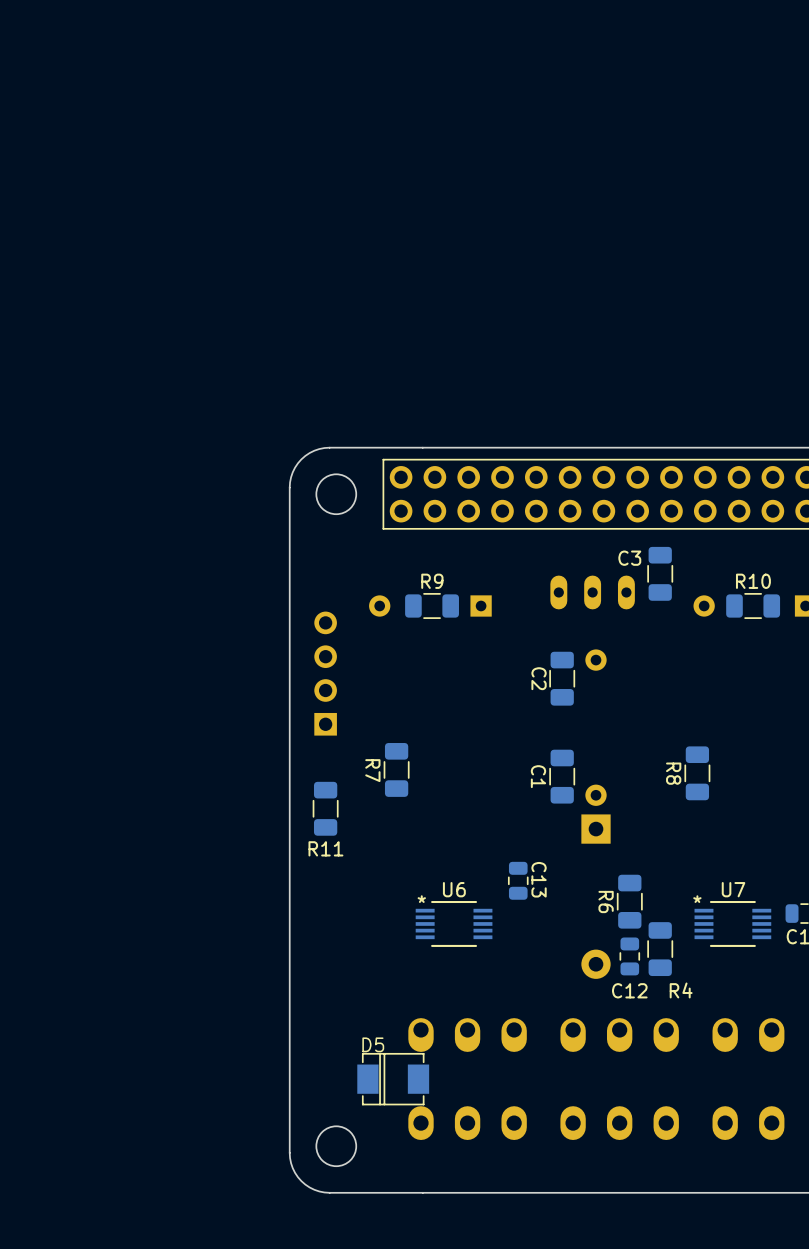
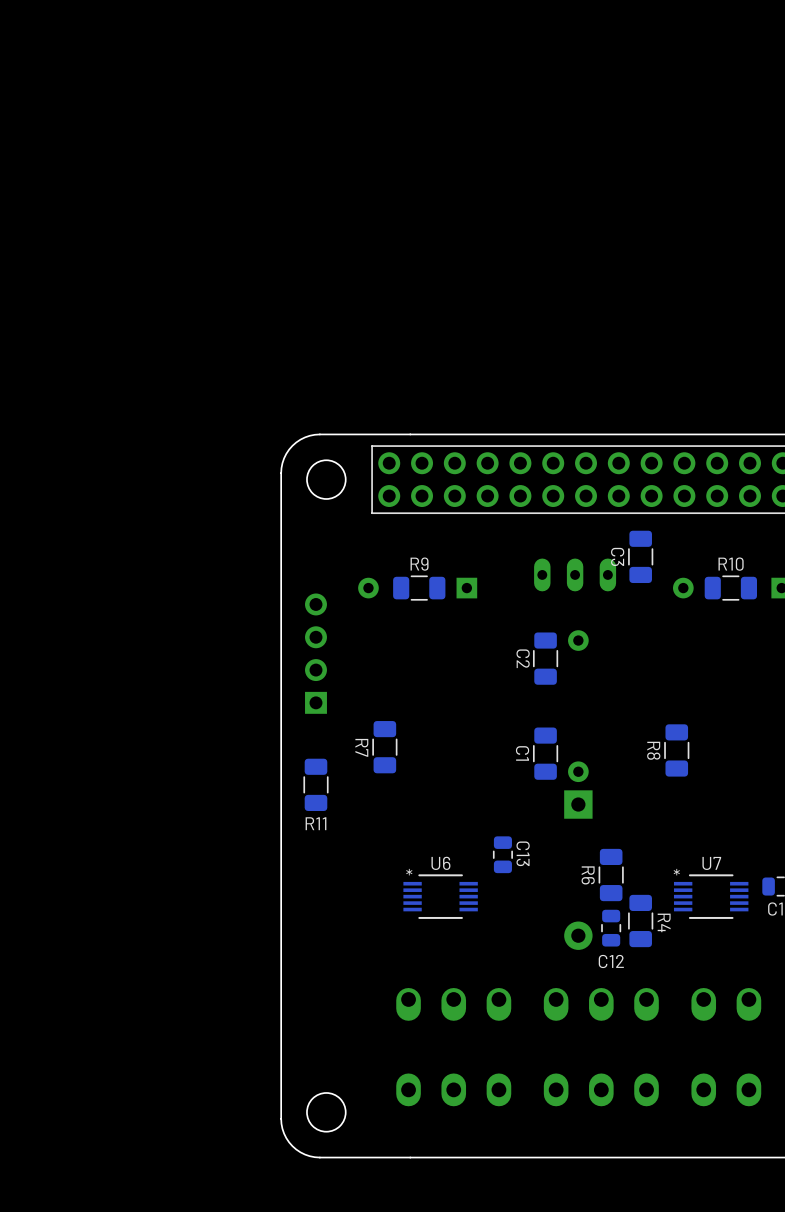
C3 name rotation: 0° (629, 558) -> 90° clockwise (617, 556)
R4 name rotation: 0° (681, 990) -> 90° clockwise (664, 922)
R4 name position: R4 (681, 990) -> R4 (664, 922)
D5: (393, 1079) -> none

